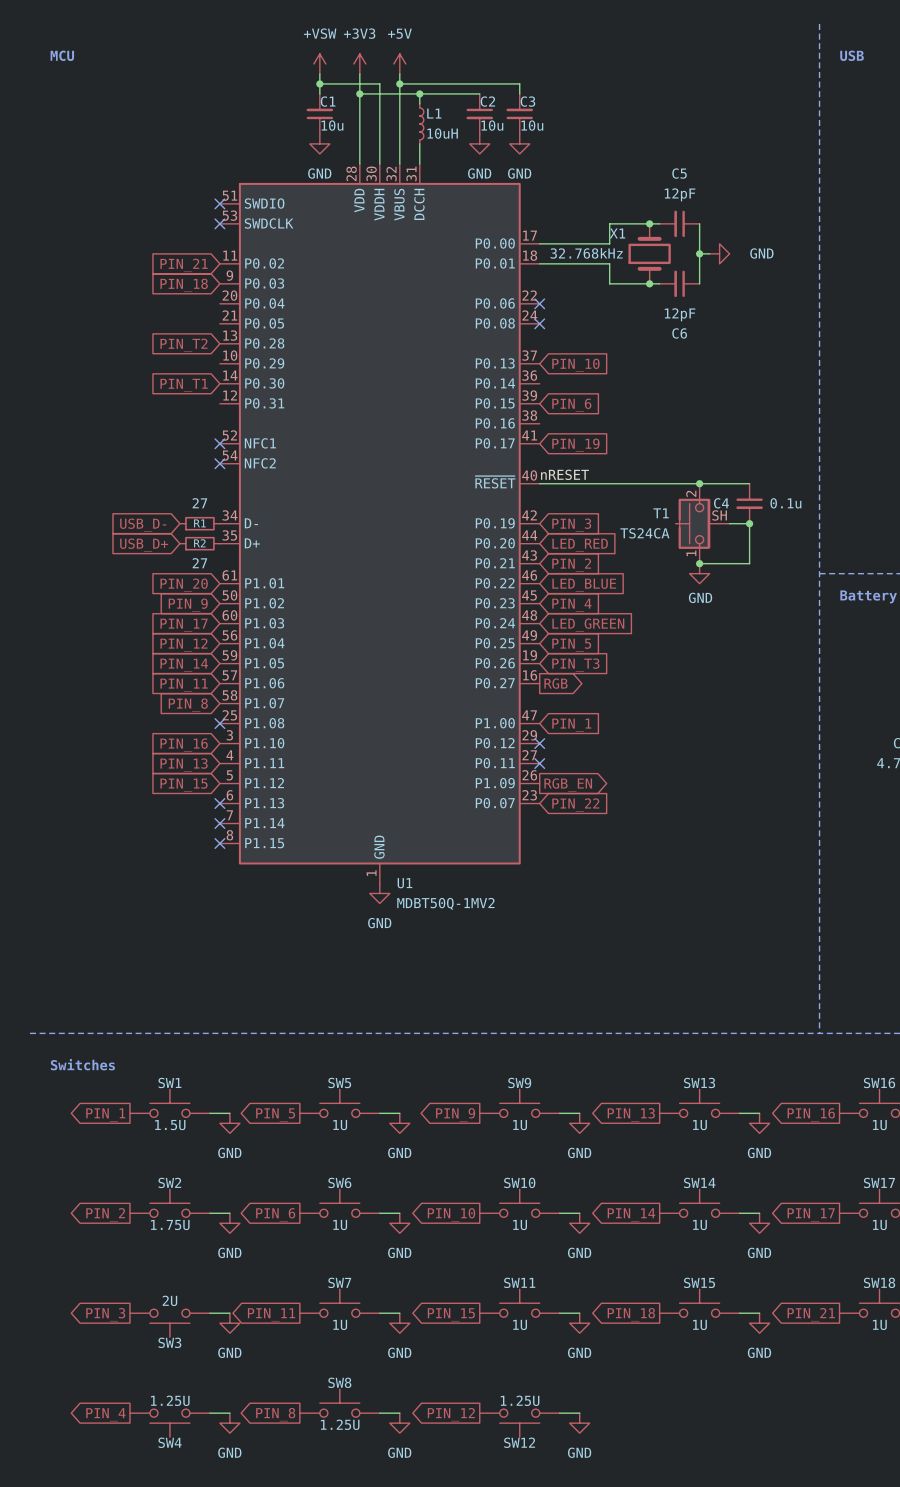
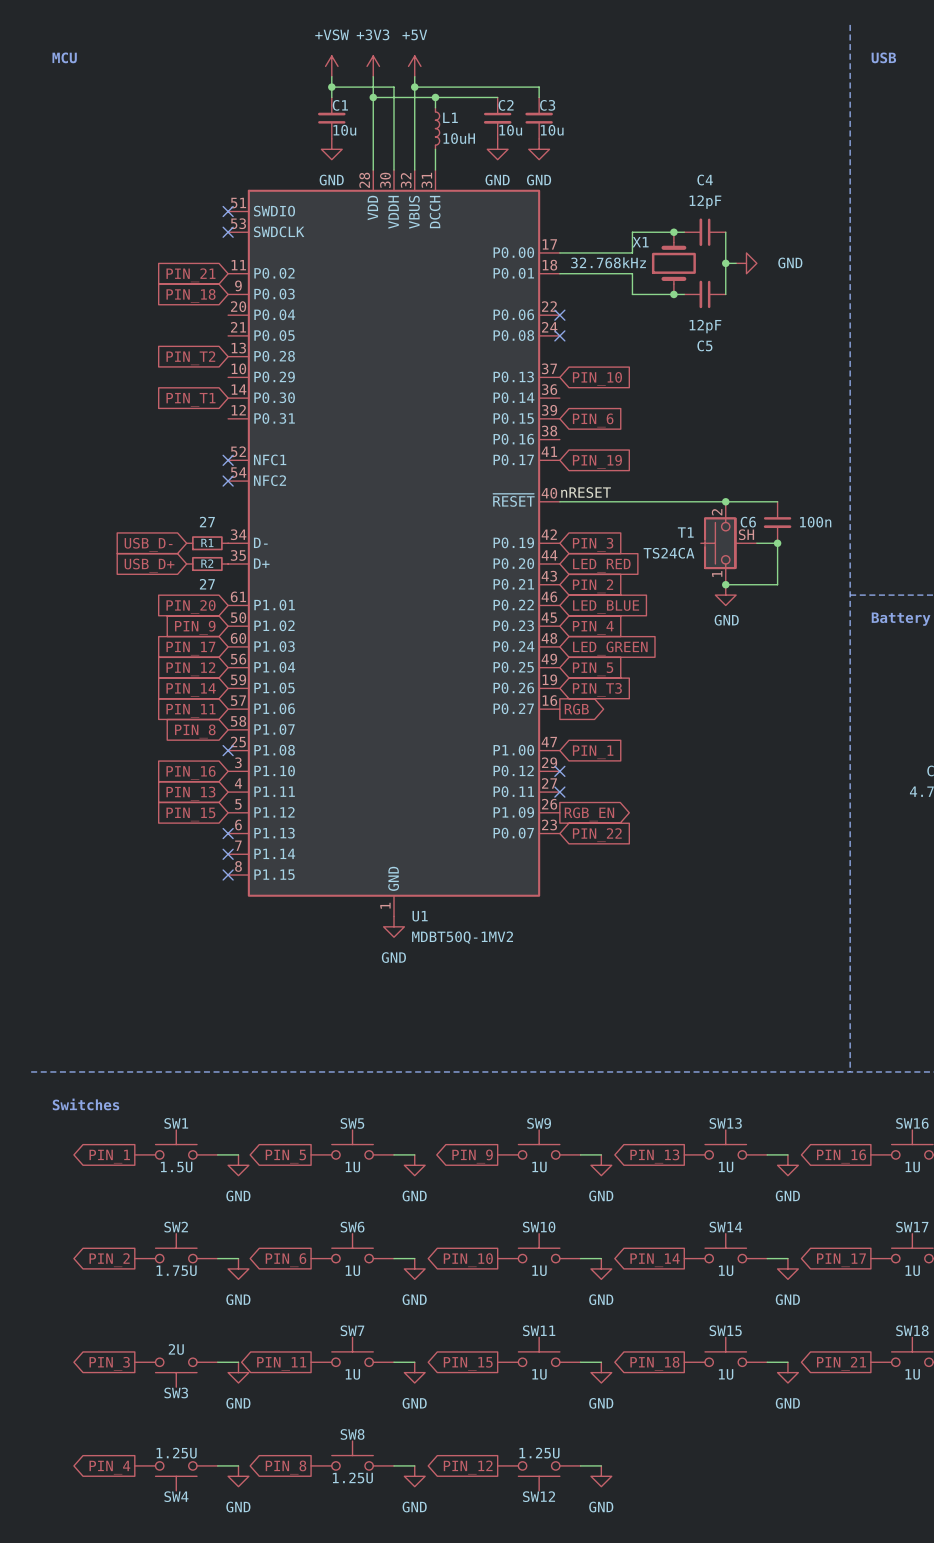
C5 name: C5 (679, 173) -> C4 (705, 180)
C6 name: C6 (679, 333) -> C5 (704, 345)
C4 name: C4 (721, 503) -> C6 (748, 522)
C4 value: 0.1u (785, 503) -> 100n (815, 522)

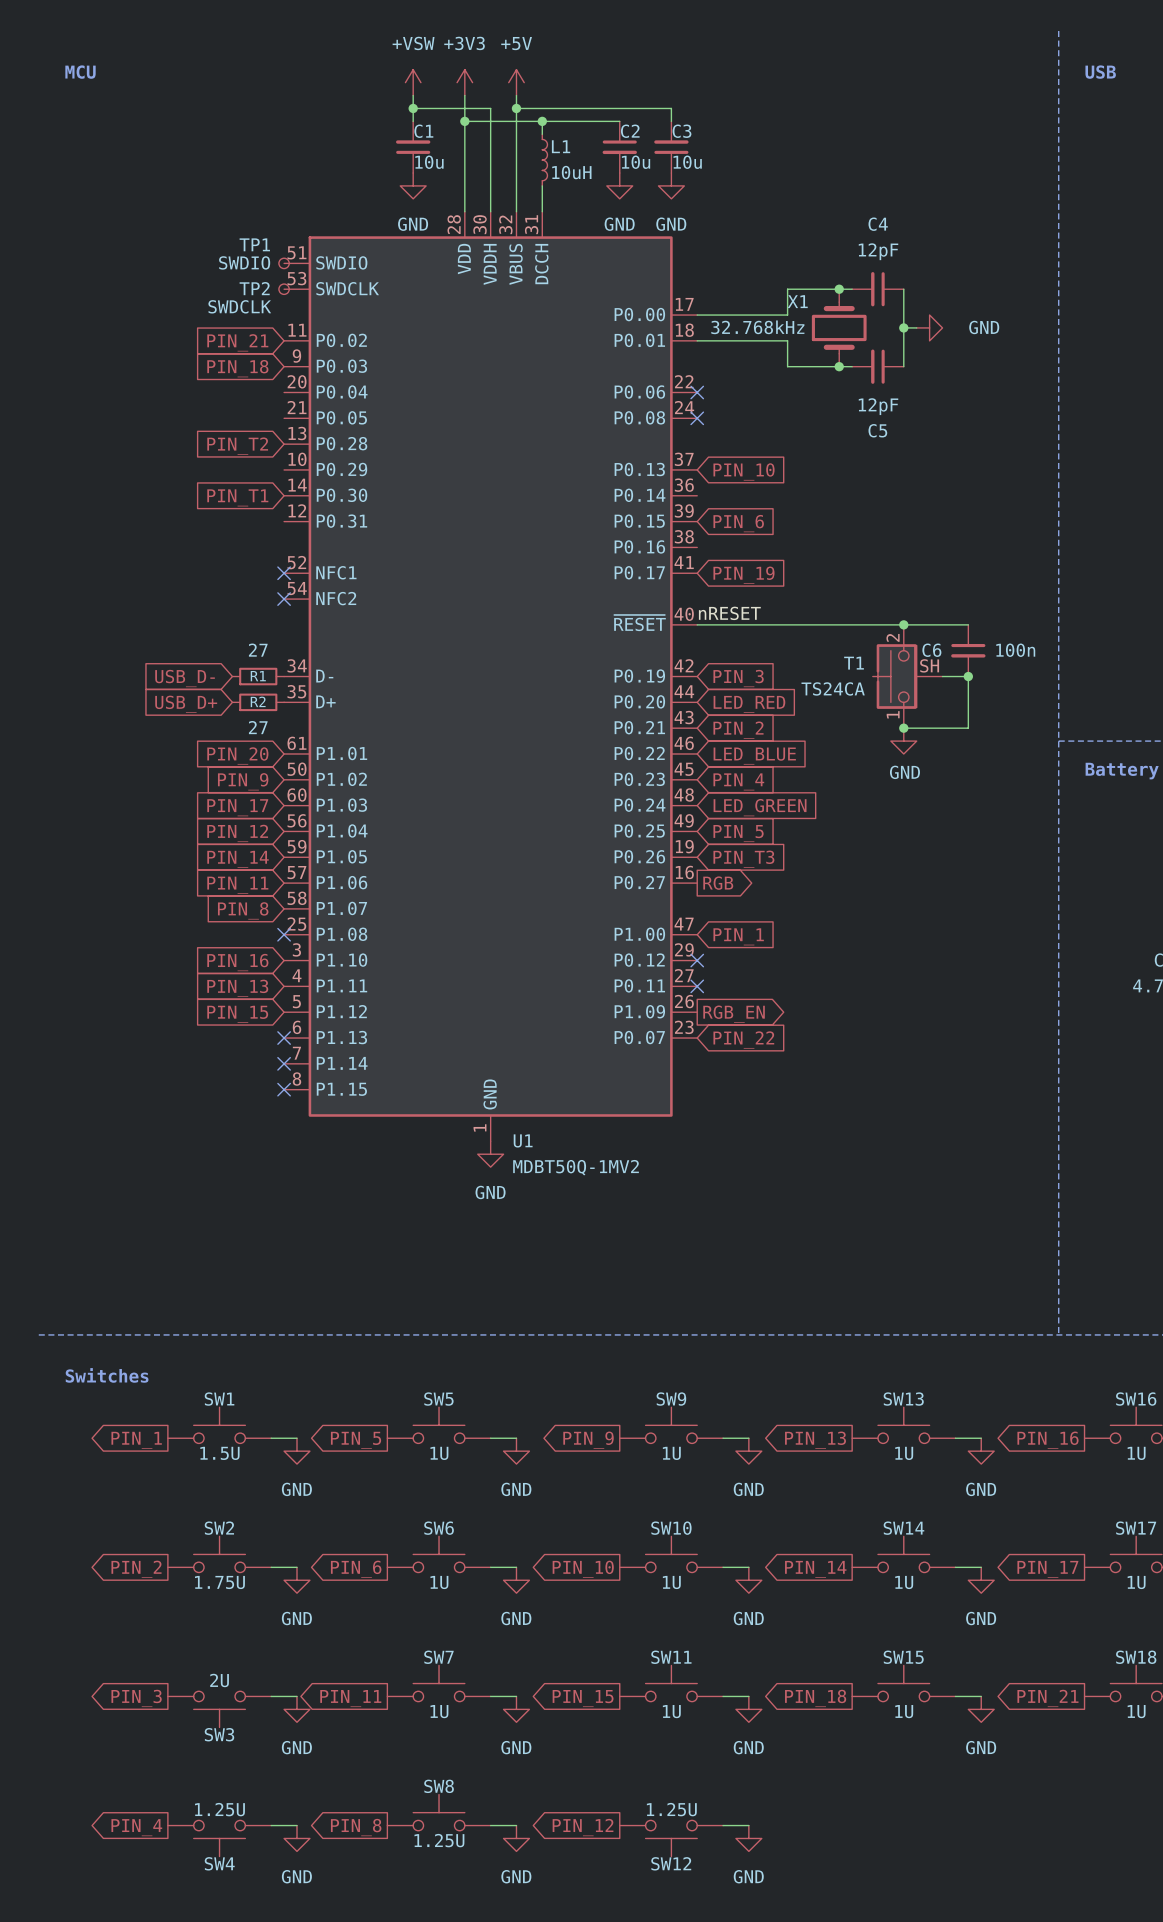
no-connect mark: (228, 211) -> none
TP1: none -> SWDIO (284, 263)
no-connect mark: (228, 232) -> none
TP2: none -> SWDCLK (284, 289)

